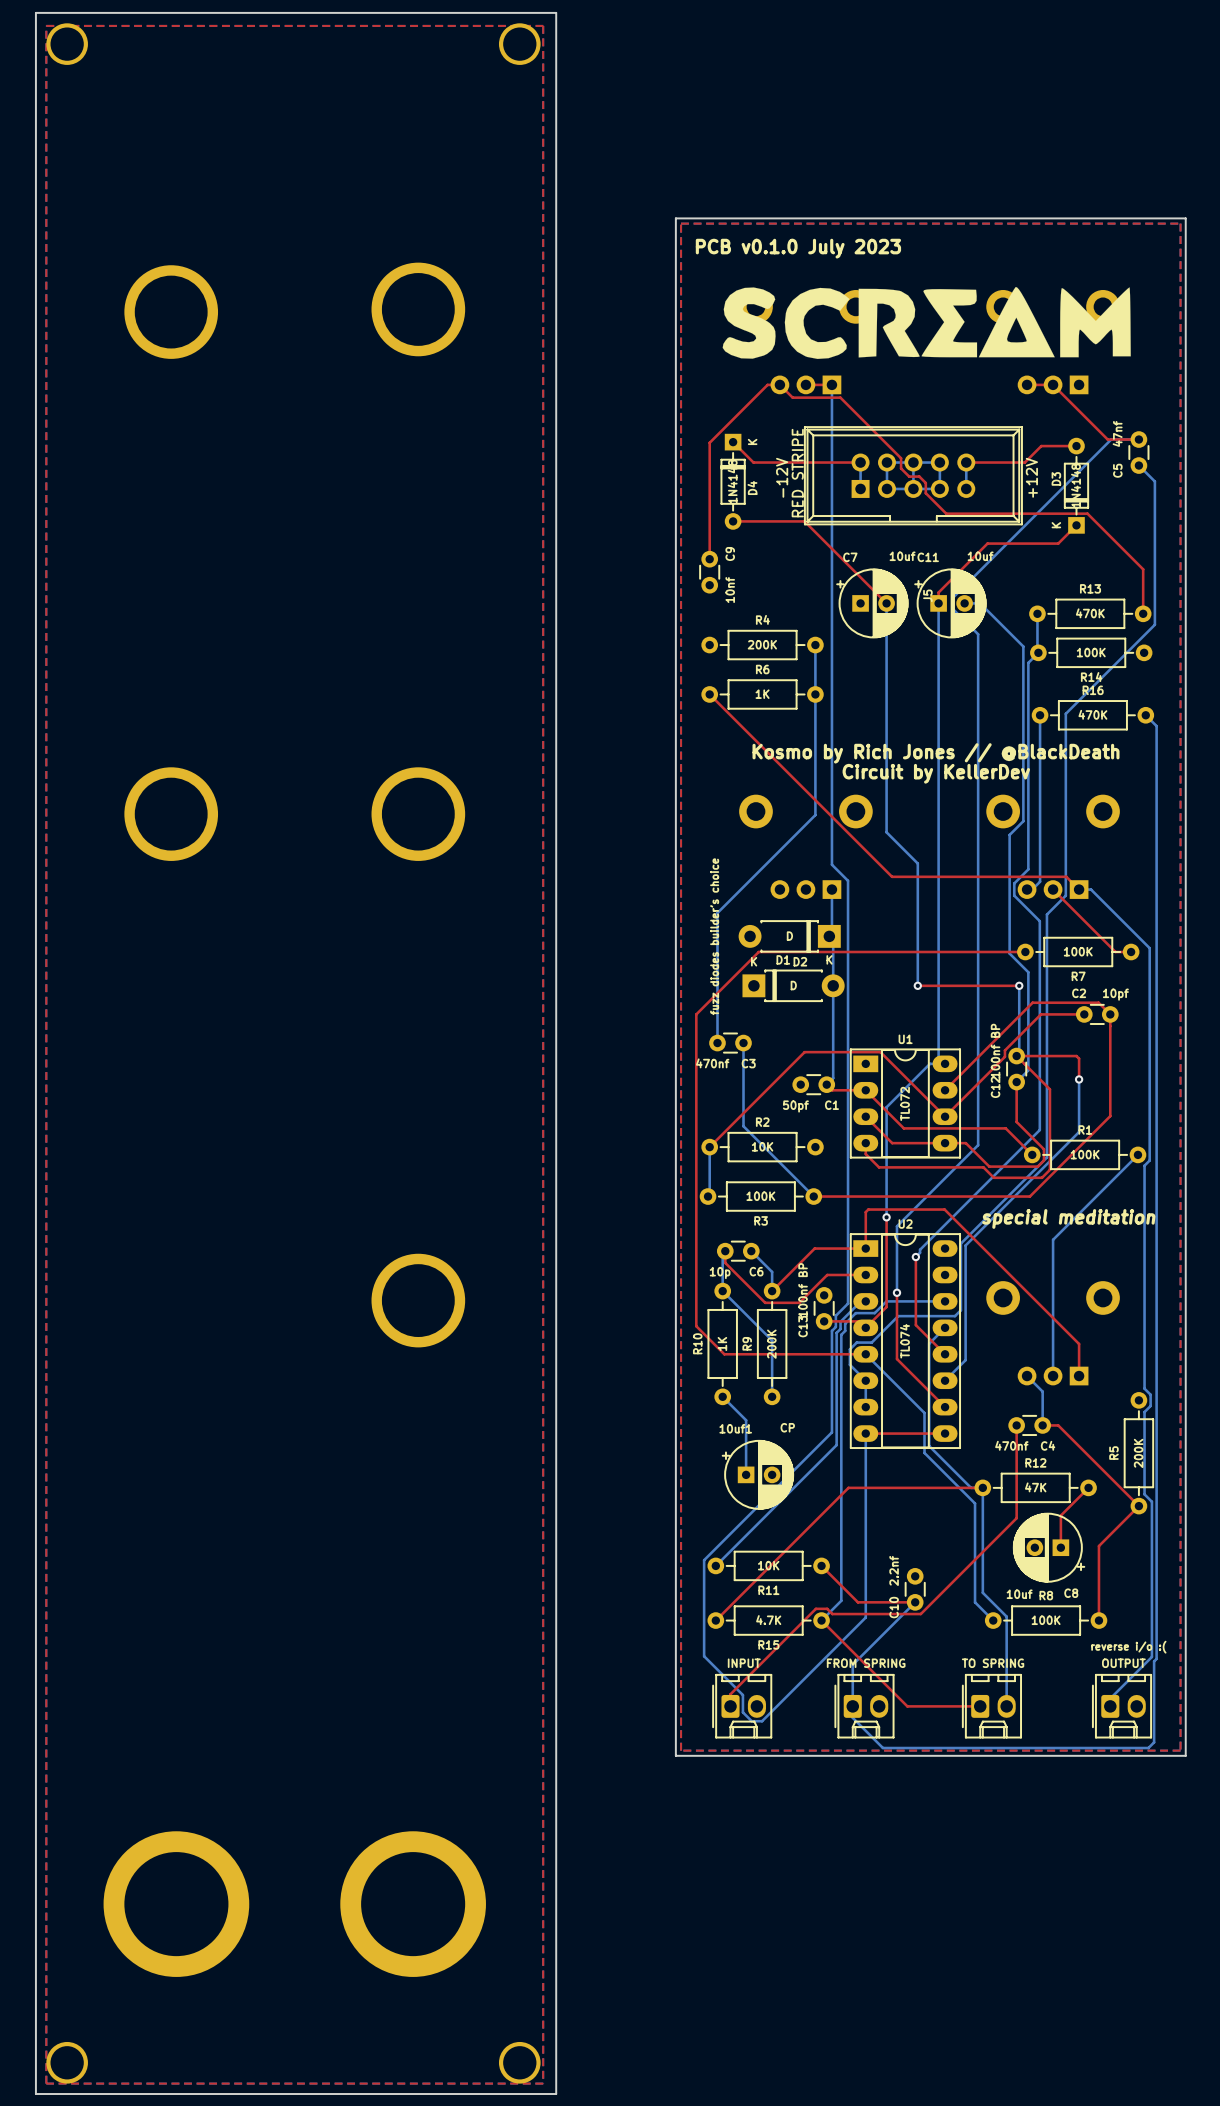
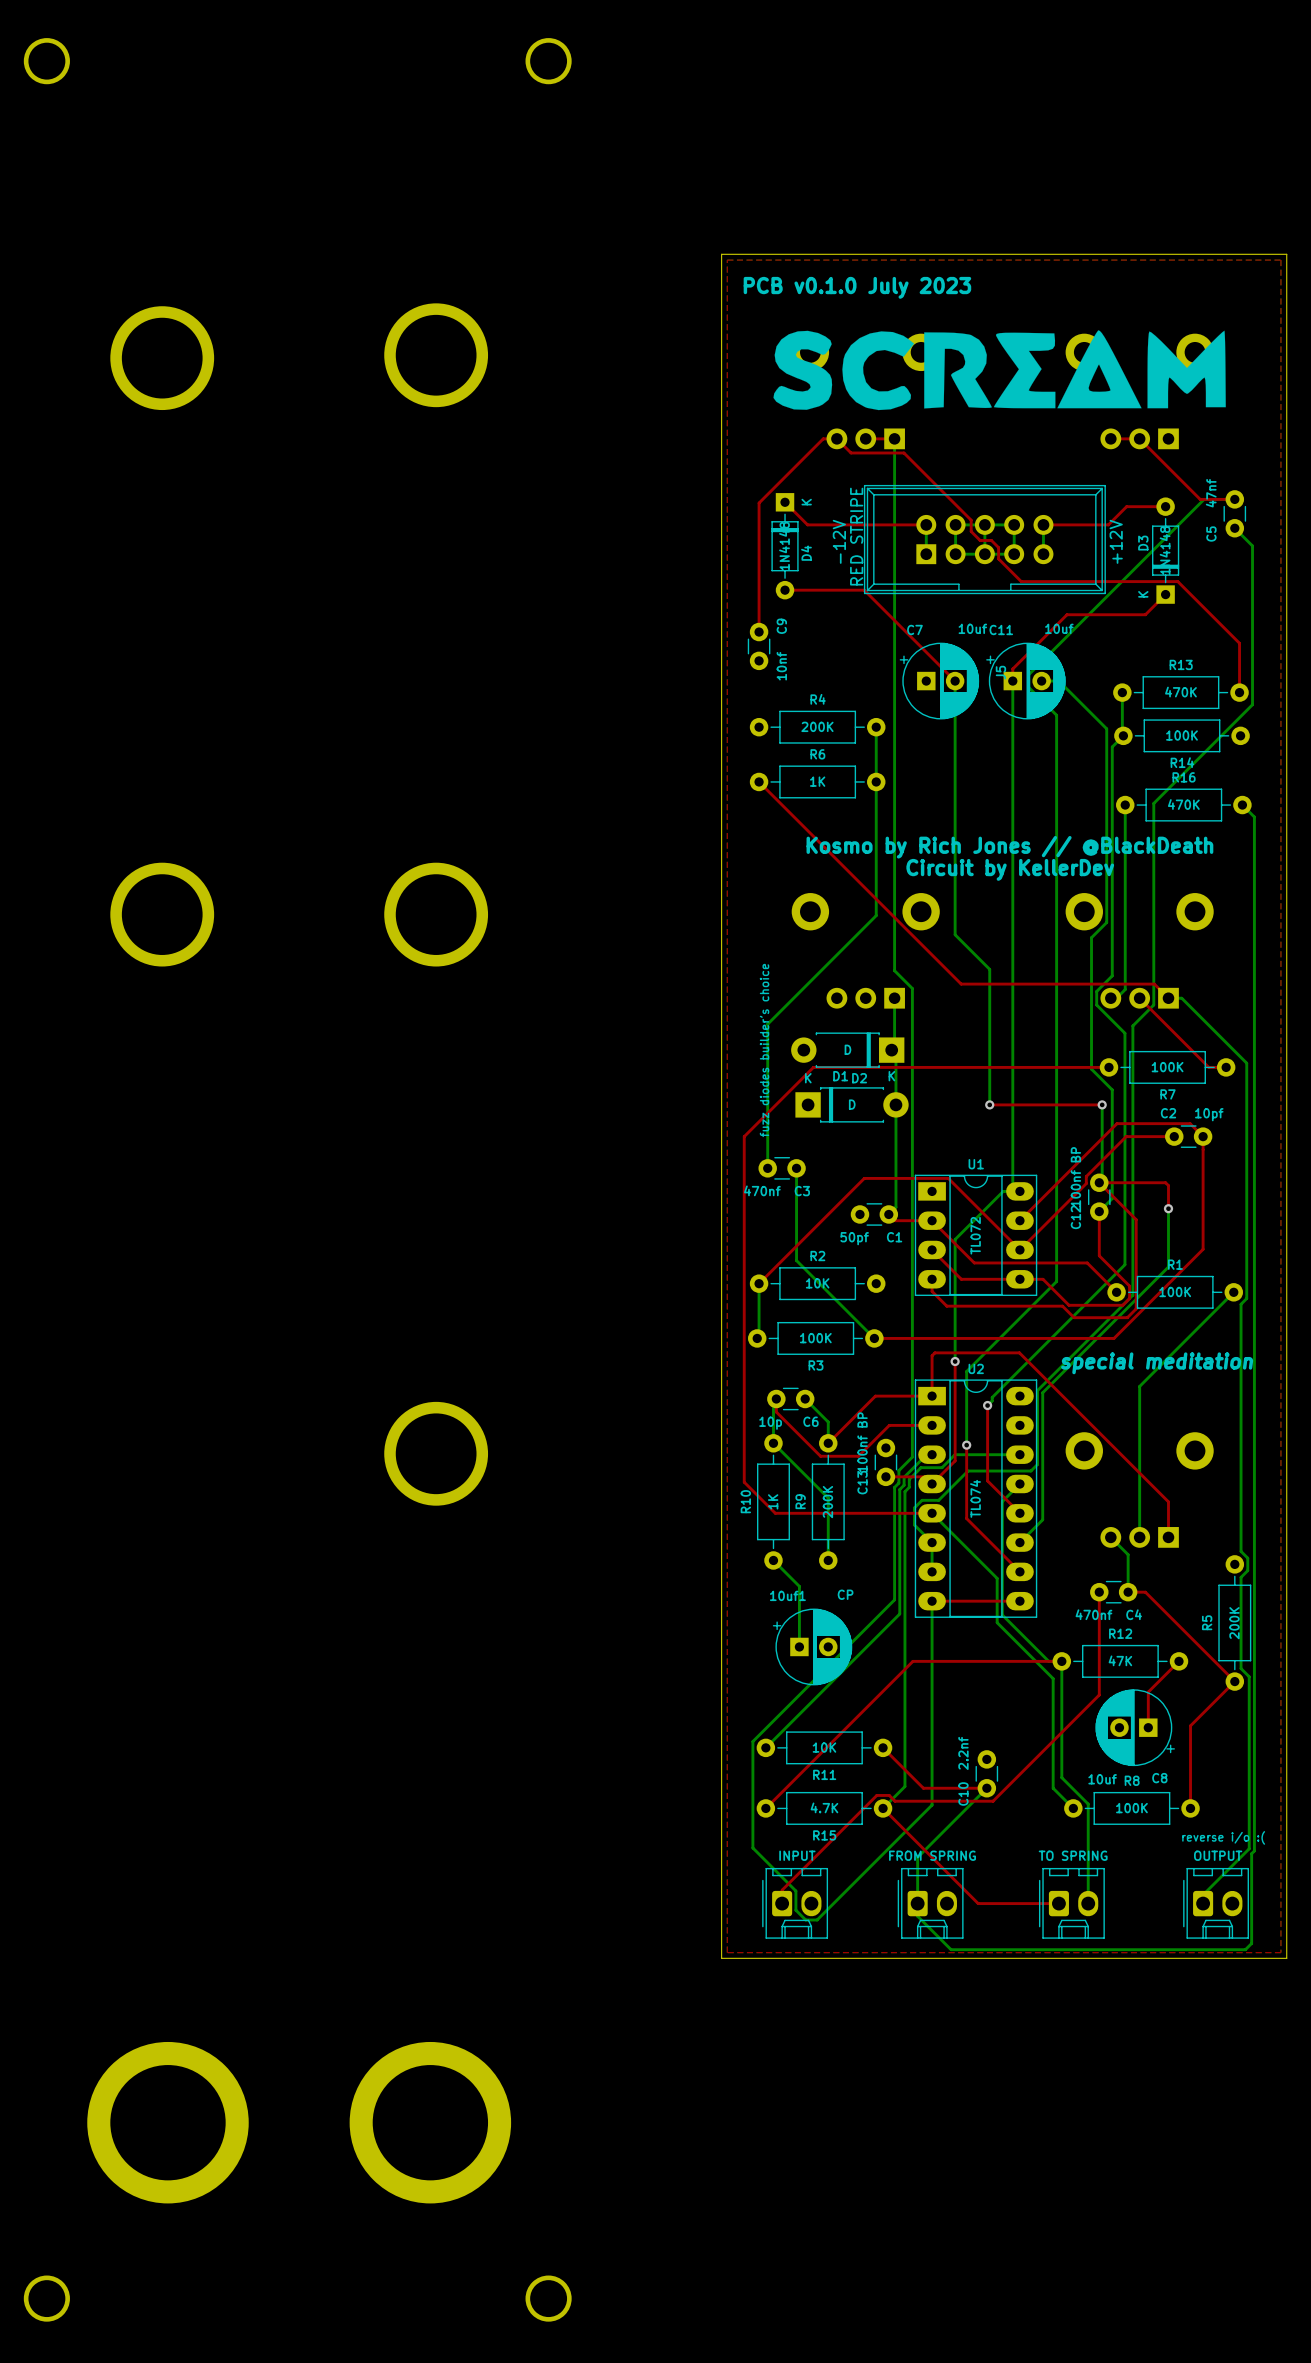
board edge: (35, 12) (35, 2094) (556, 2094) (556, 12) (35, 12) -> none
top zone outline: (46, 25) (46, 2083) (543, 2083) (543, 25) (46, 25) -> none

